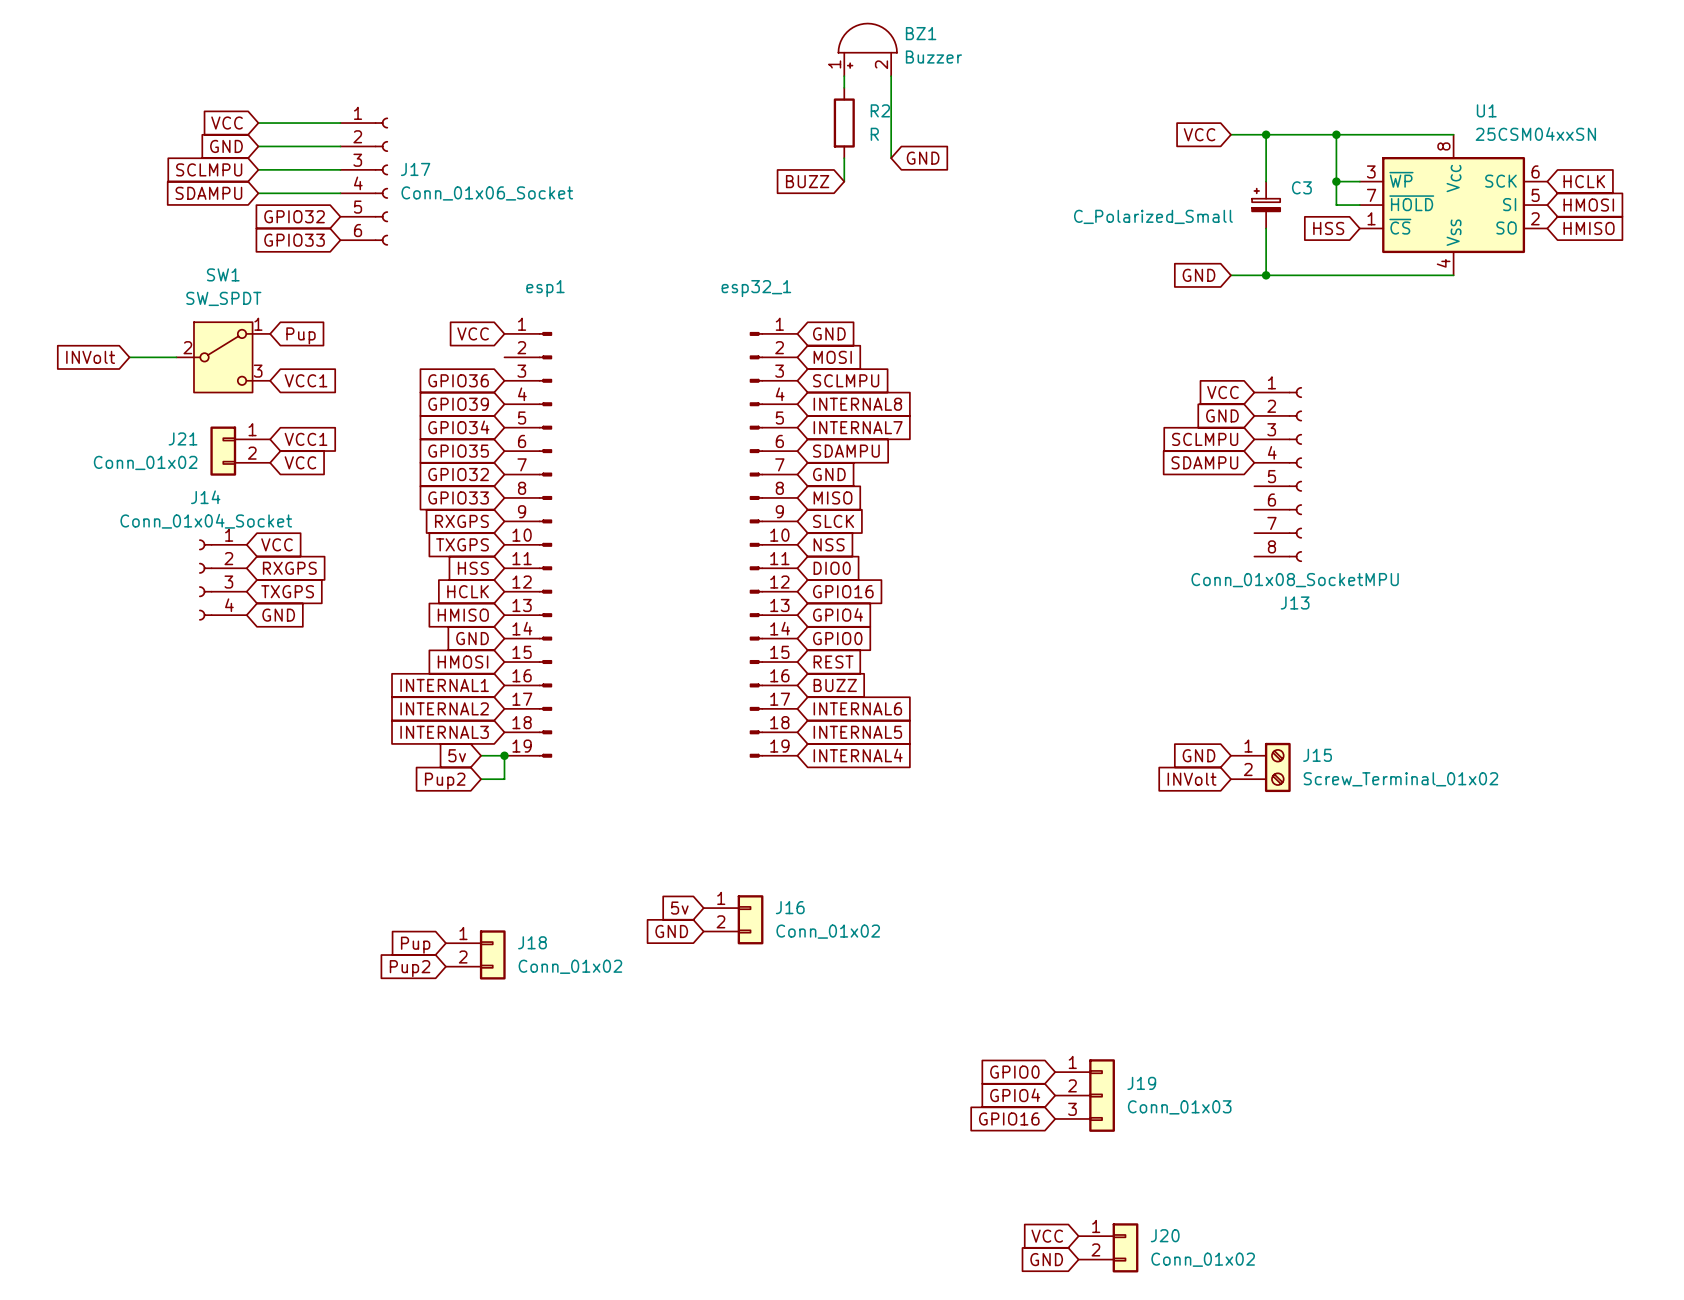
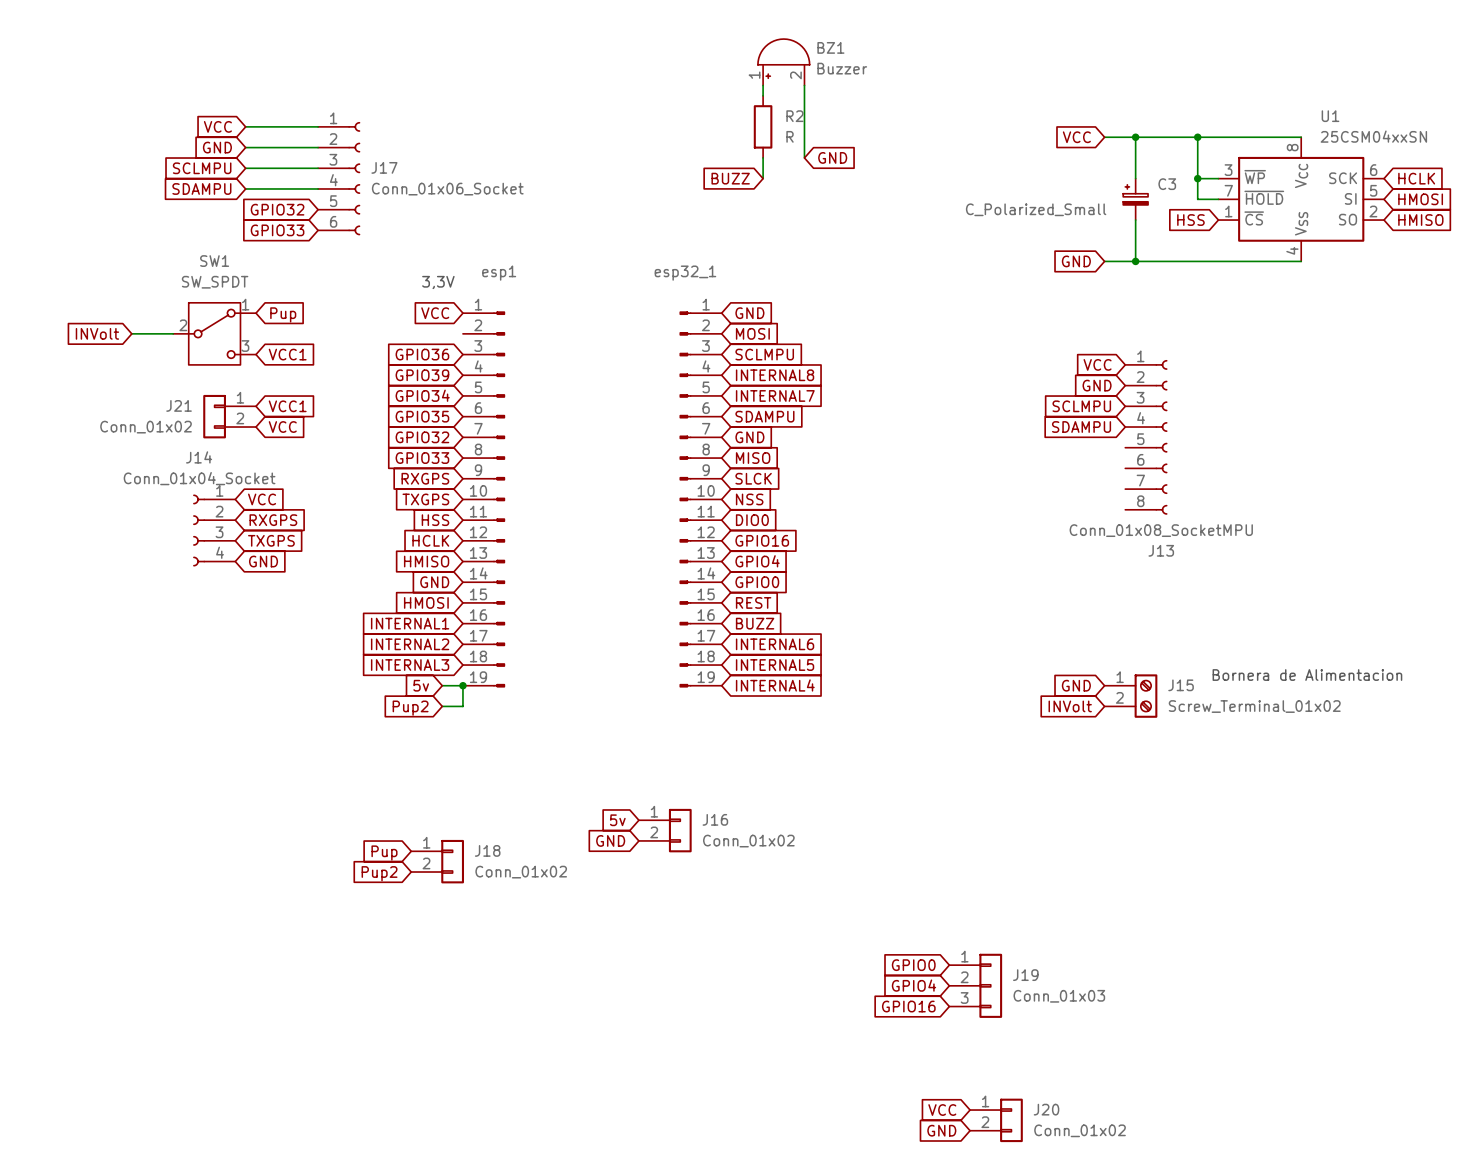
text: none -> 3,3V (438, 282)
text: none -> Bornera de Alimentacion (1307, 675)

